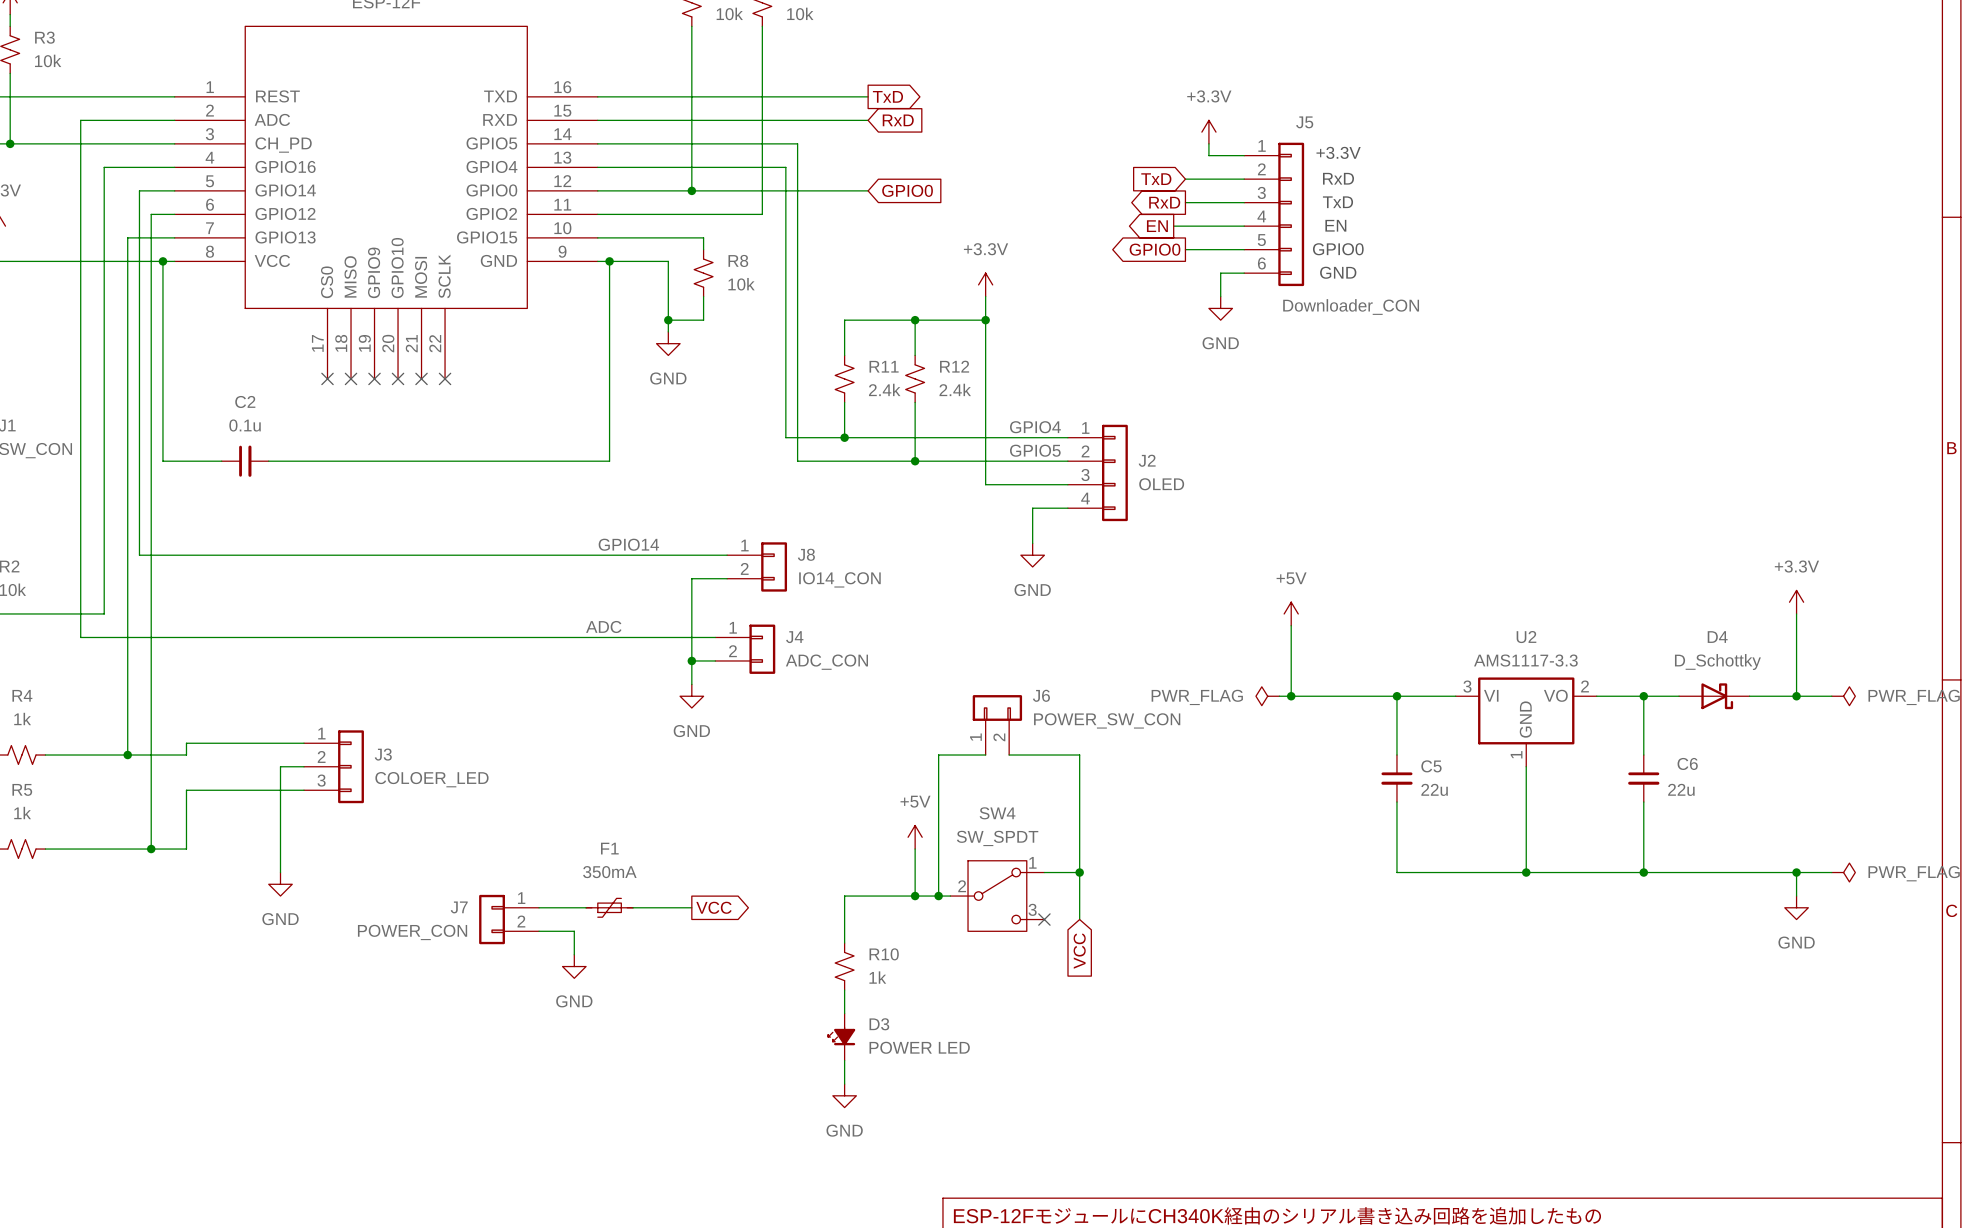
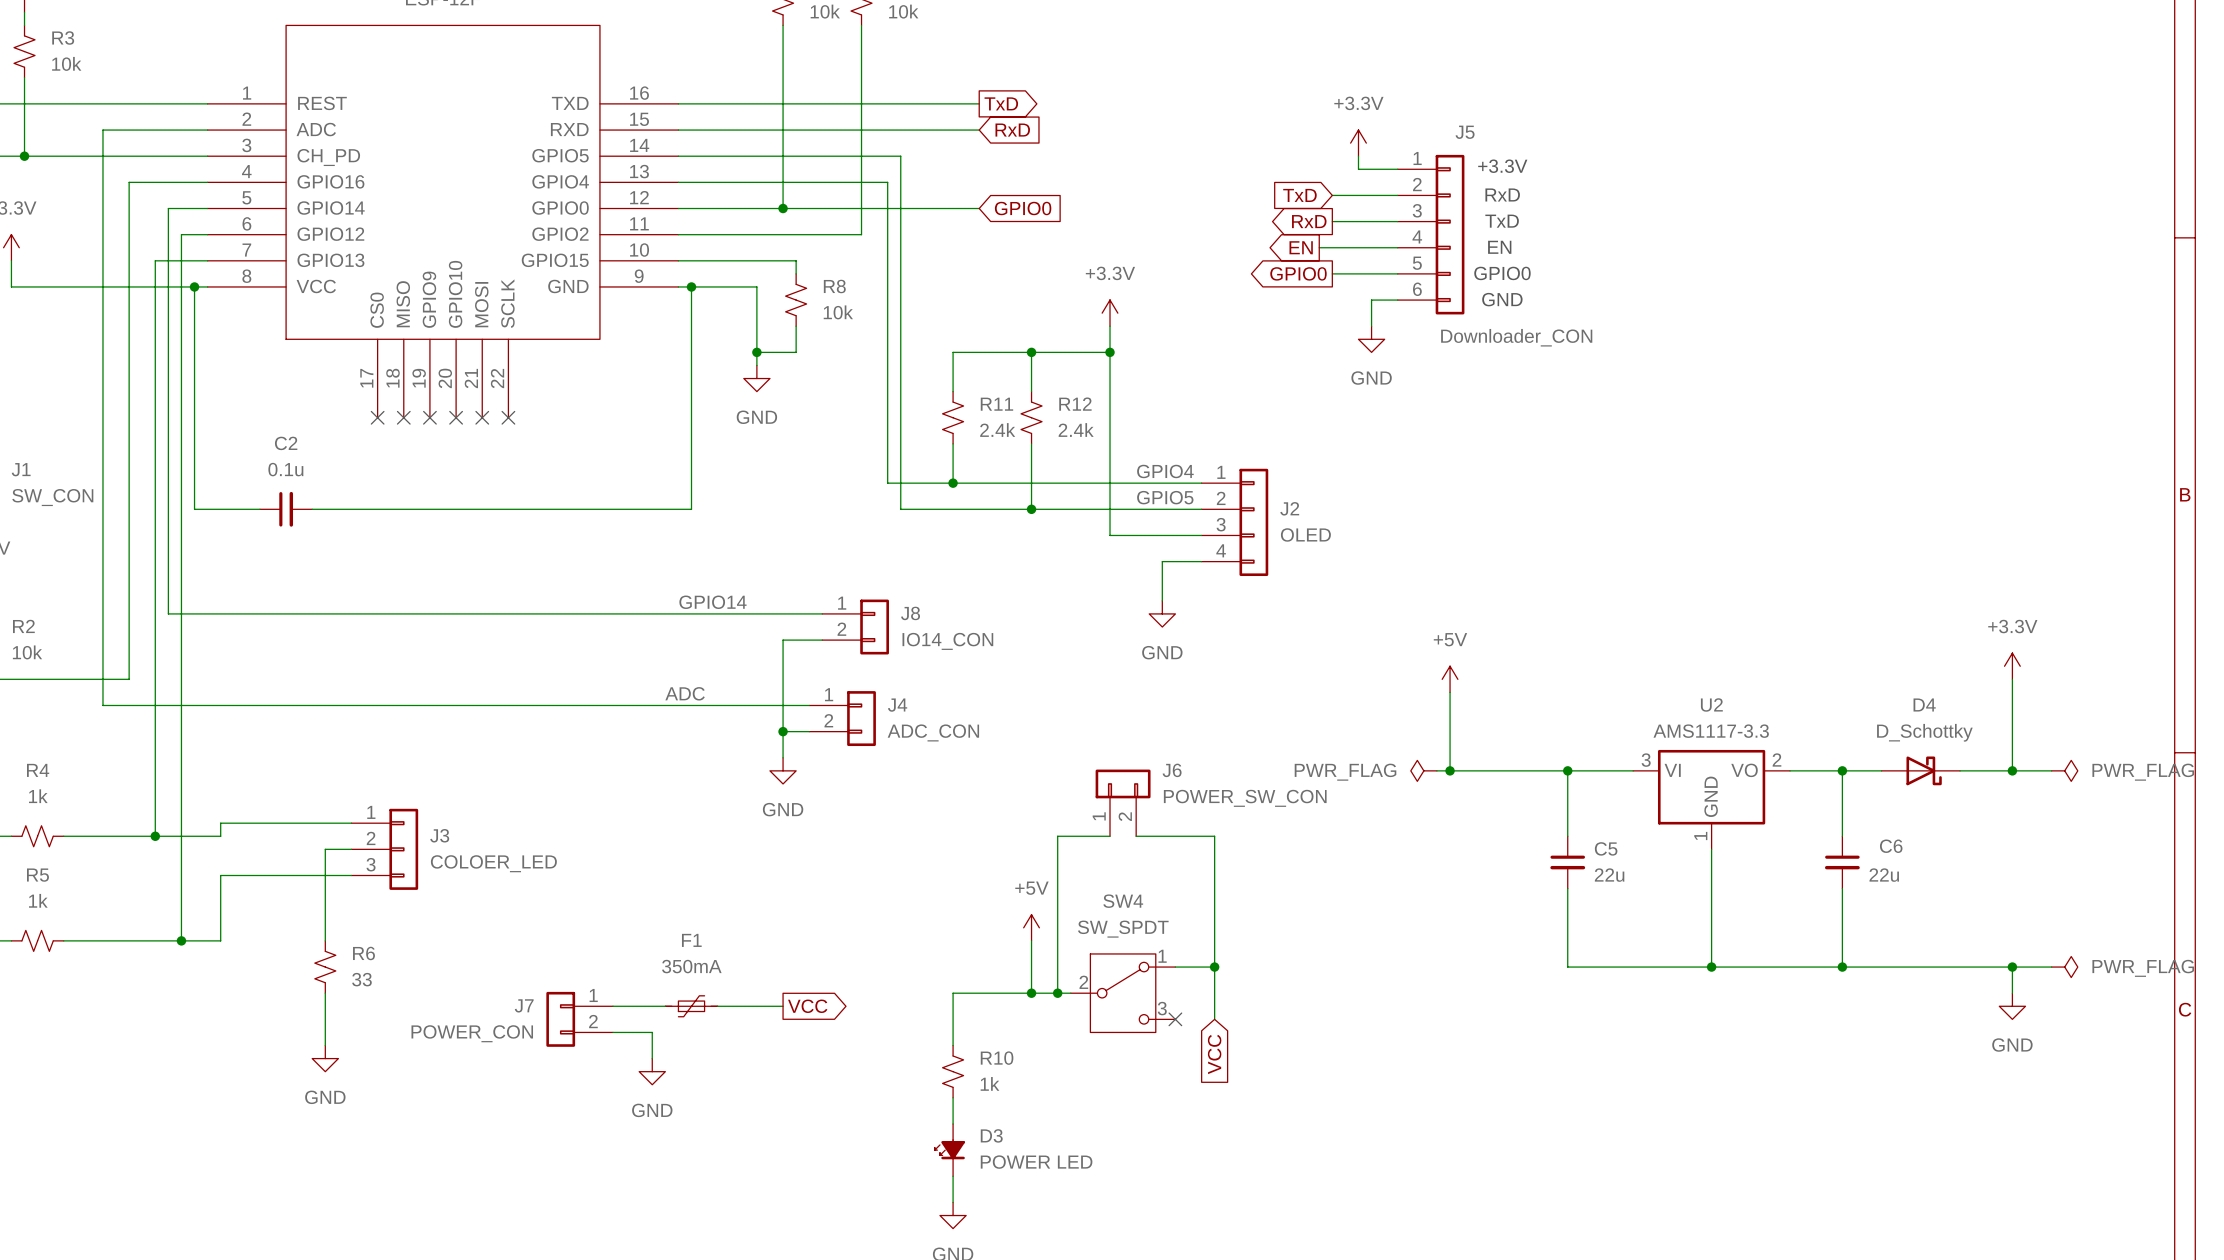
wire: (280, 849) (280, 872) -> none
R6: none -> 33 (325, 967)
power symbol position: GND (280, 884) -> GND (325, 1058)
wire: none -> (325, 993) (325, 1045)

